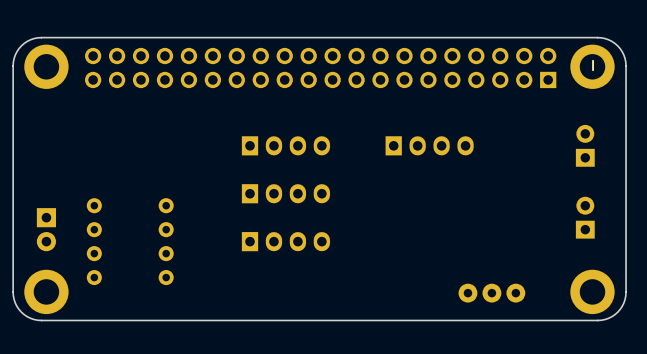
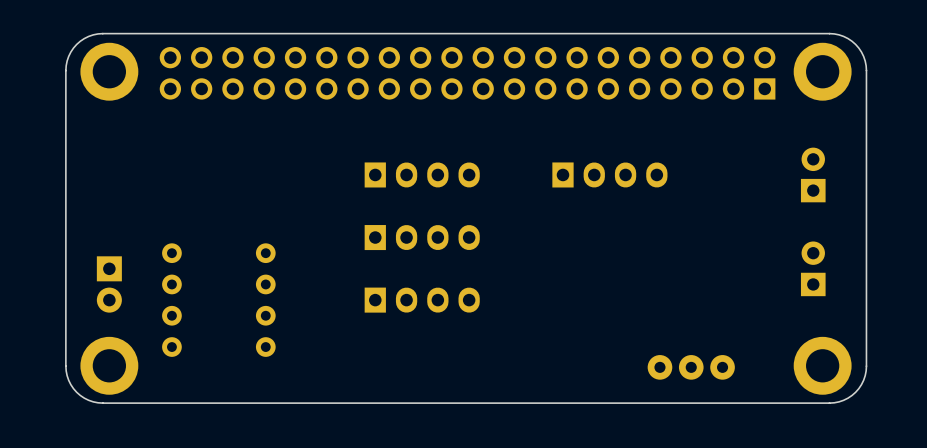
line: (593, 60) (593, 70) -> none

